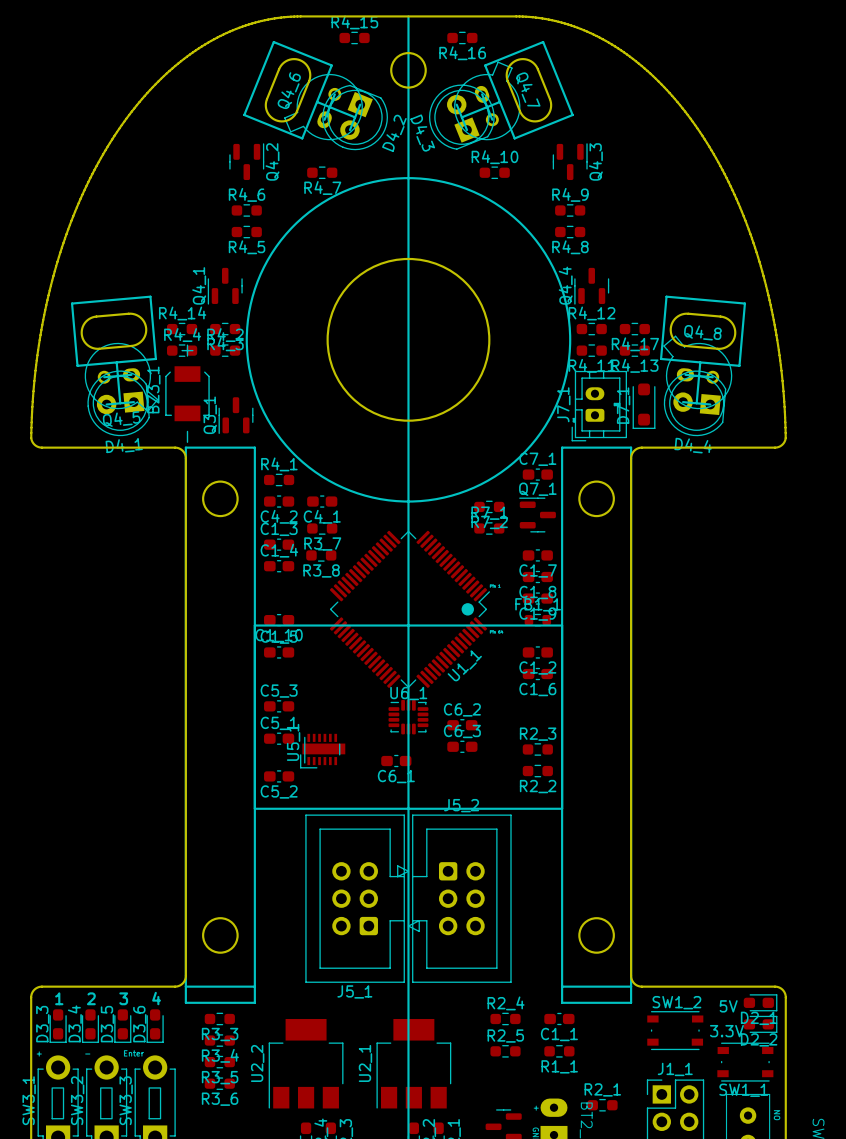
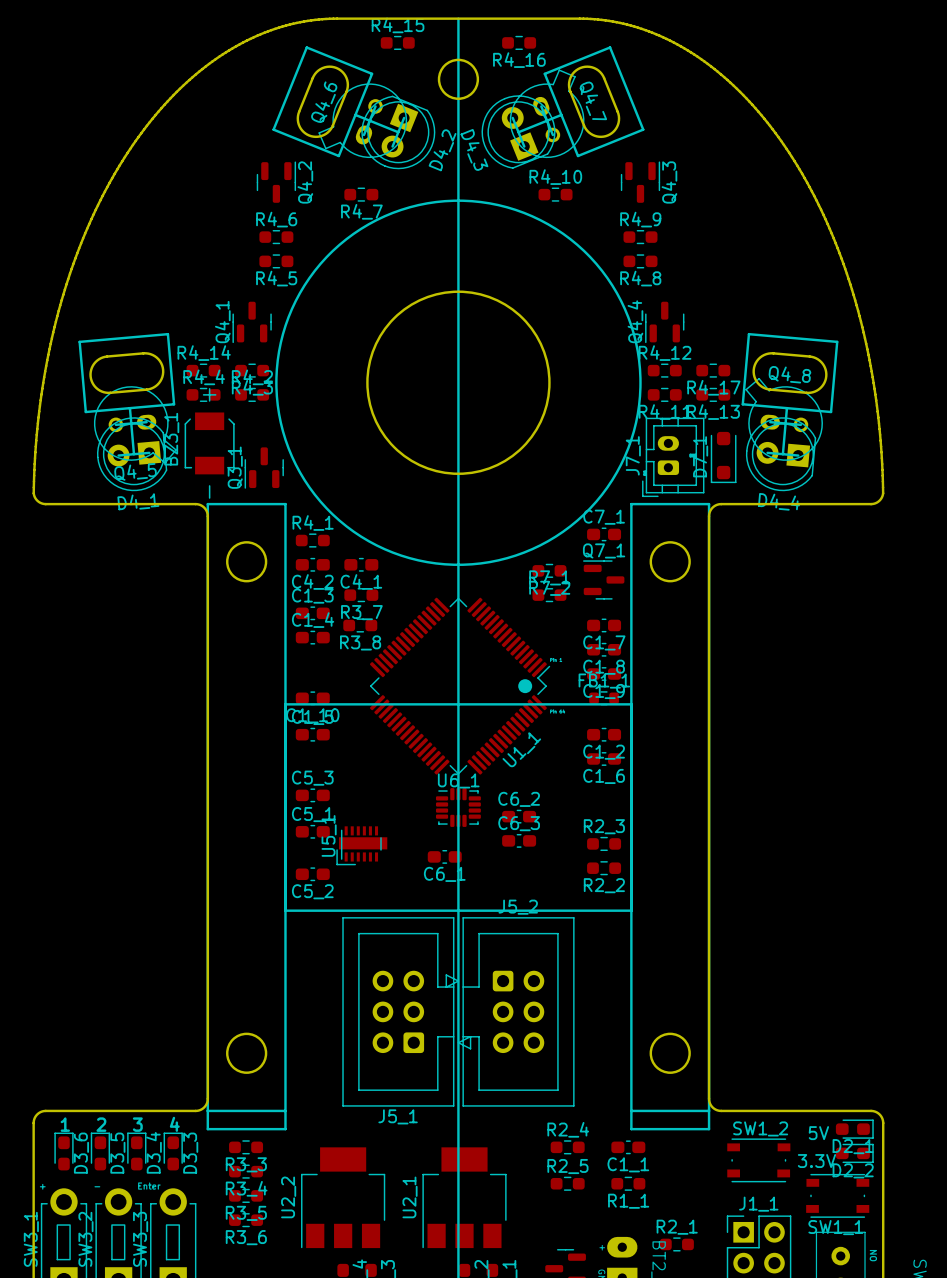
D3_3 rotation: 0° (58, 1026) -> 180° (173, 1151)
D3_3 position: (58, 1026) -> (173, 1151)
D3_4 rotation: 0° (90, 1026) -> 180° (136, 1151)
D3_4 position: (90, 1026) -> (136, 1151)
D3_5 rotation: 0° (122, 1026) -> 180° (100, 1151)
D3_5 position: (122, 1026) -> (100, 1151)
D3_6 rotation: 0° (155, 1026) -> 180° (63, 1151)
D3_6 position: (155, 1026) -> (63, 1151)

